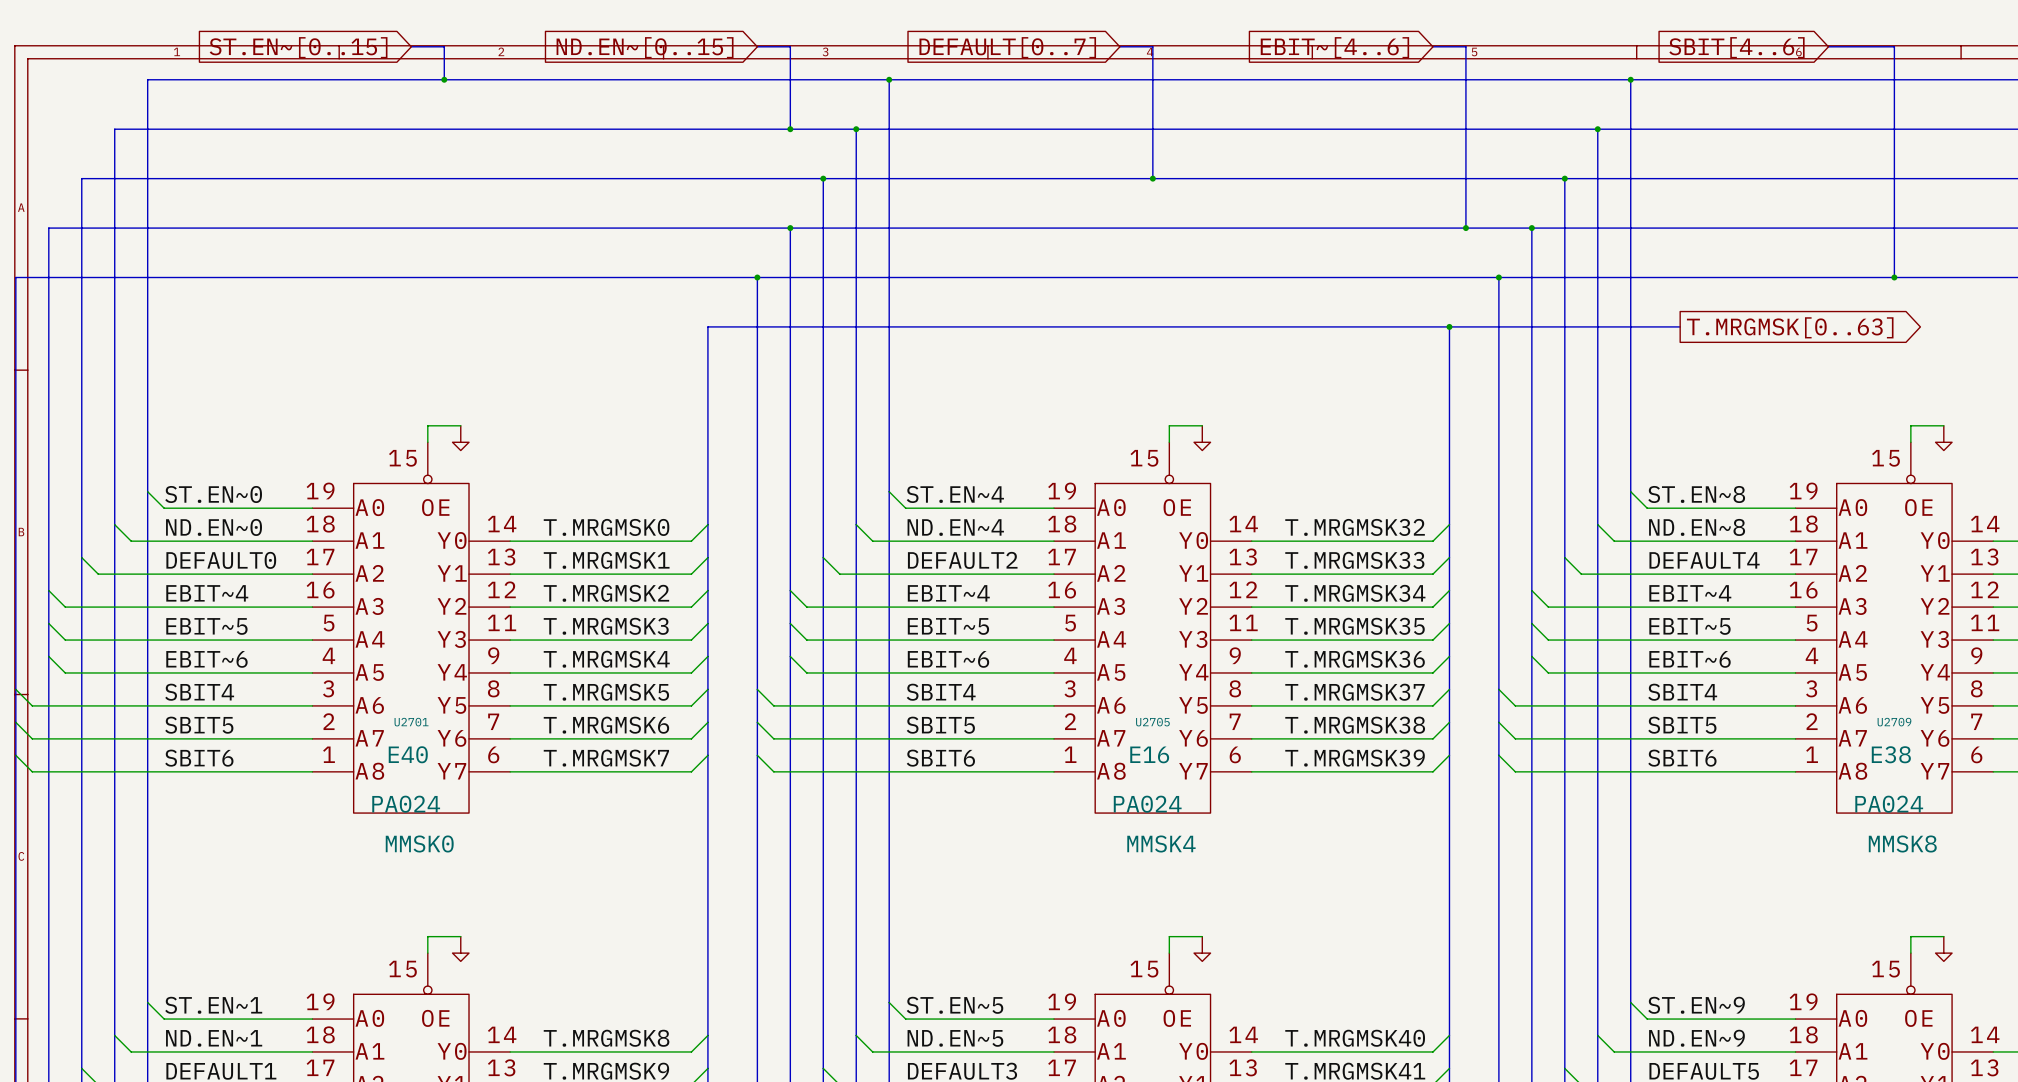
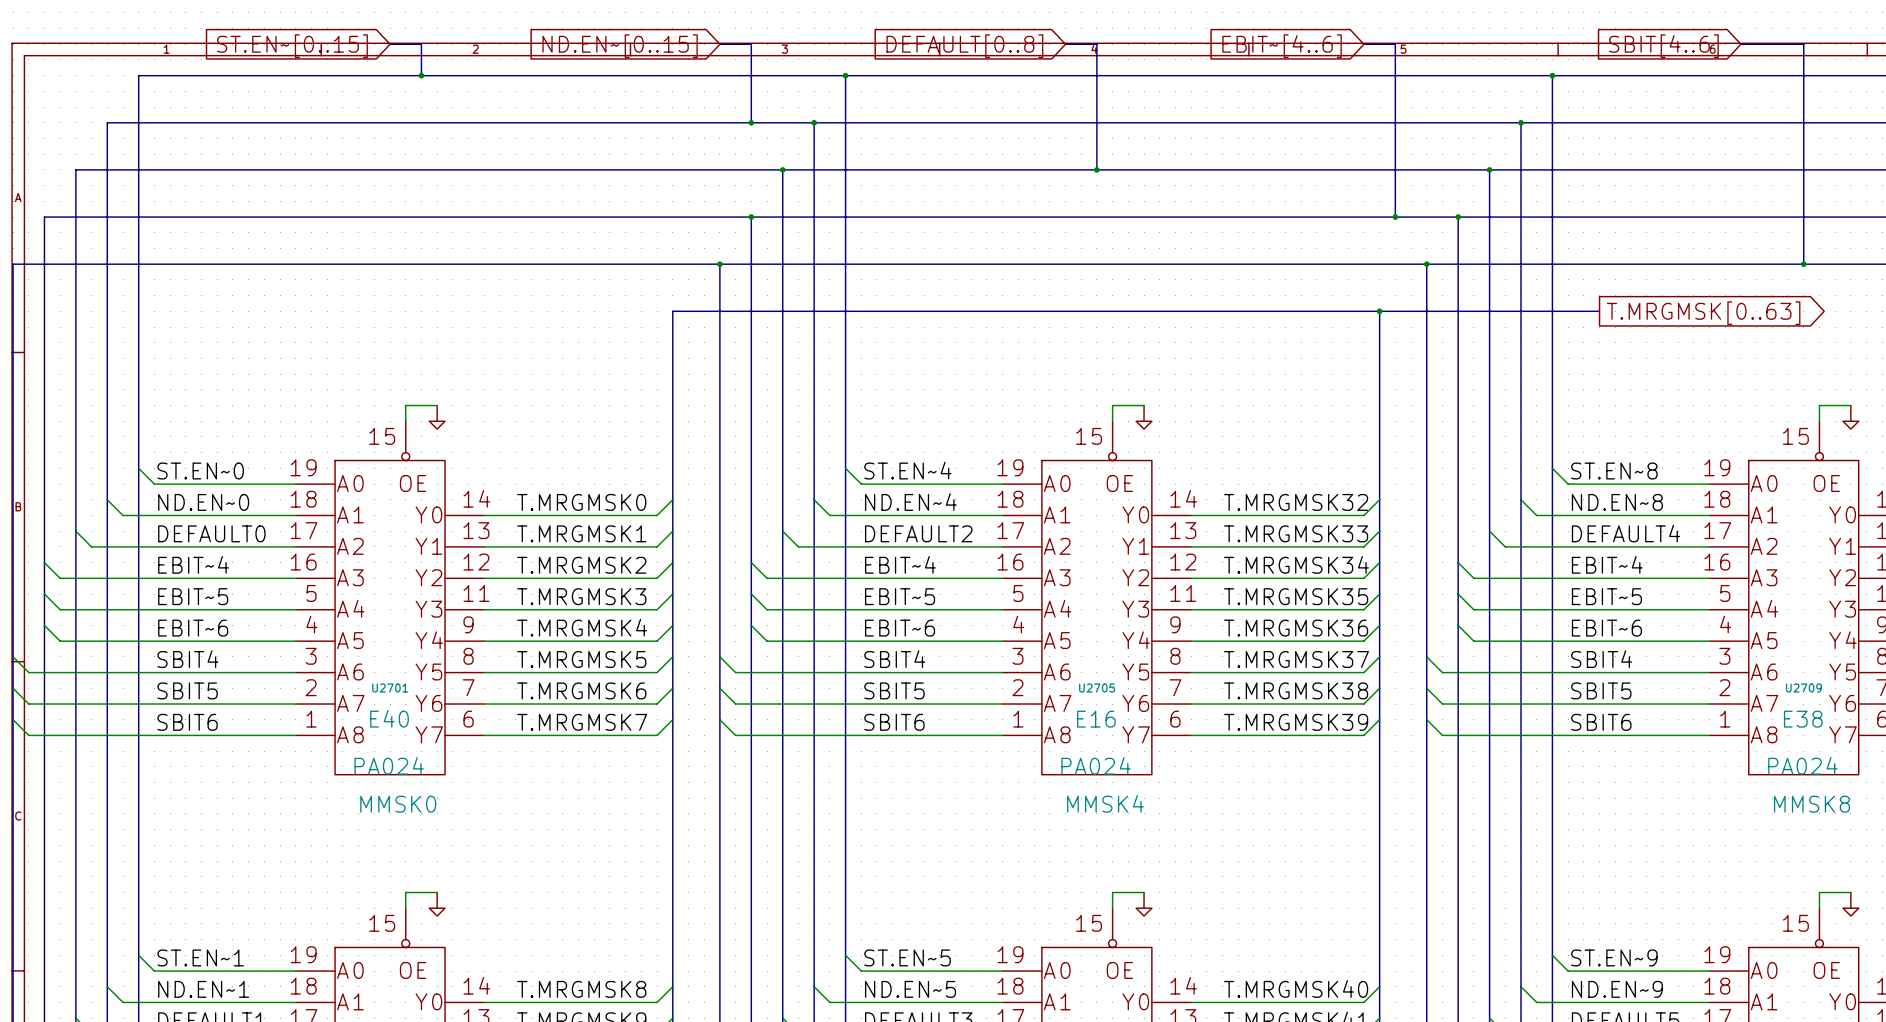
global label: DEFAULT[0..7] (1007, 47) -> DEFAULT[0..8] (964, 46)

